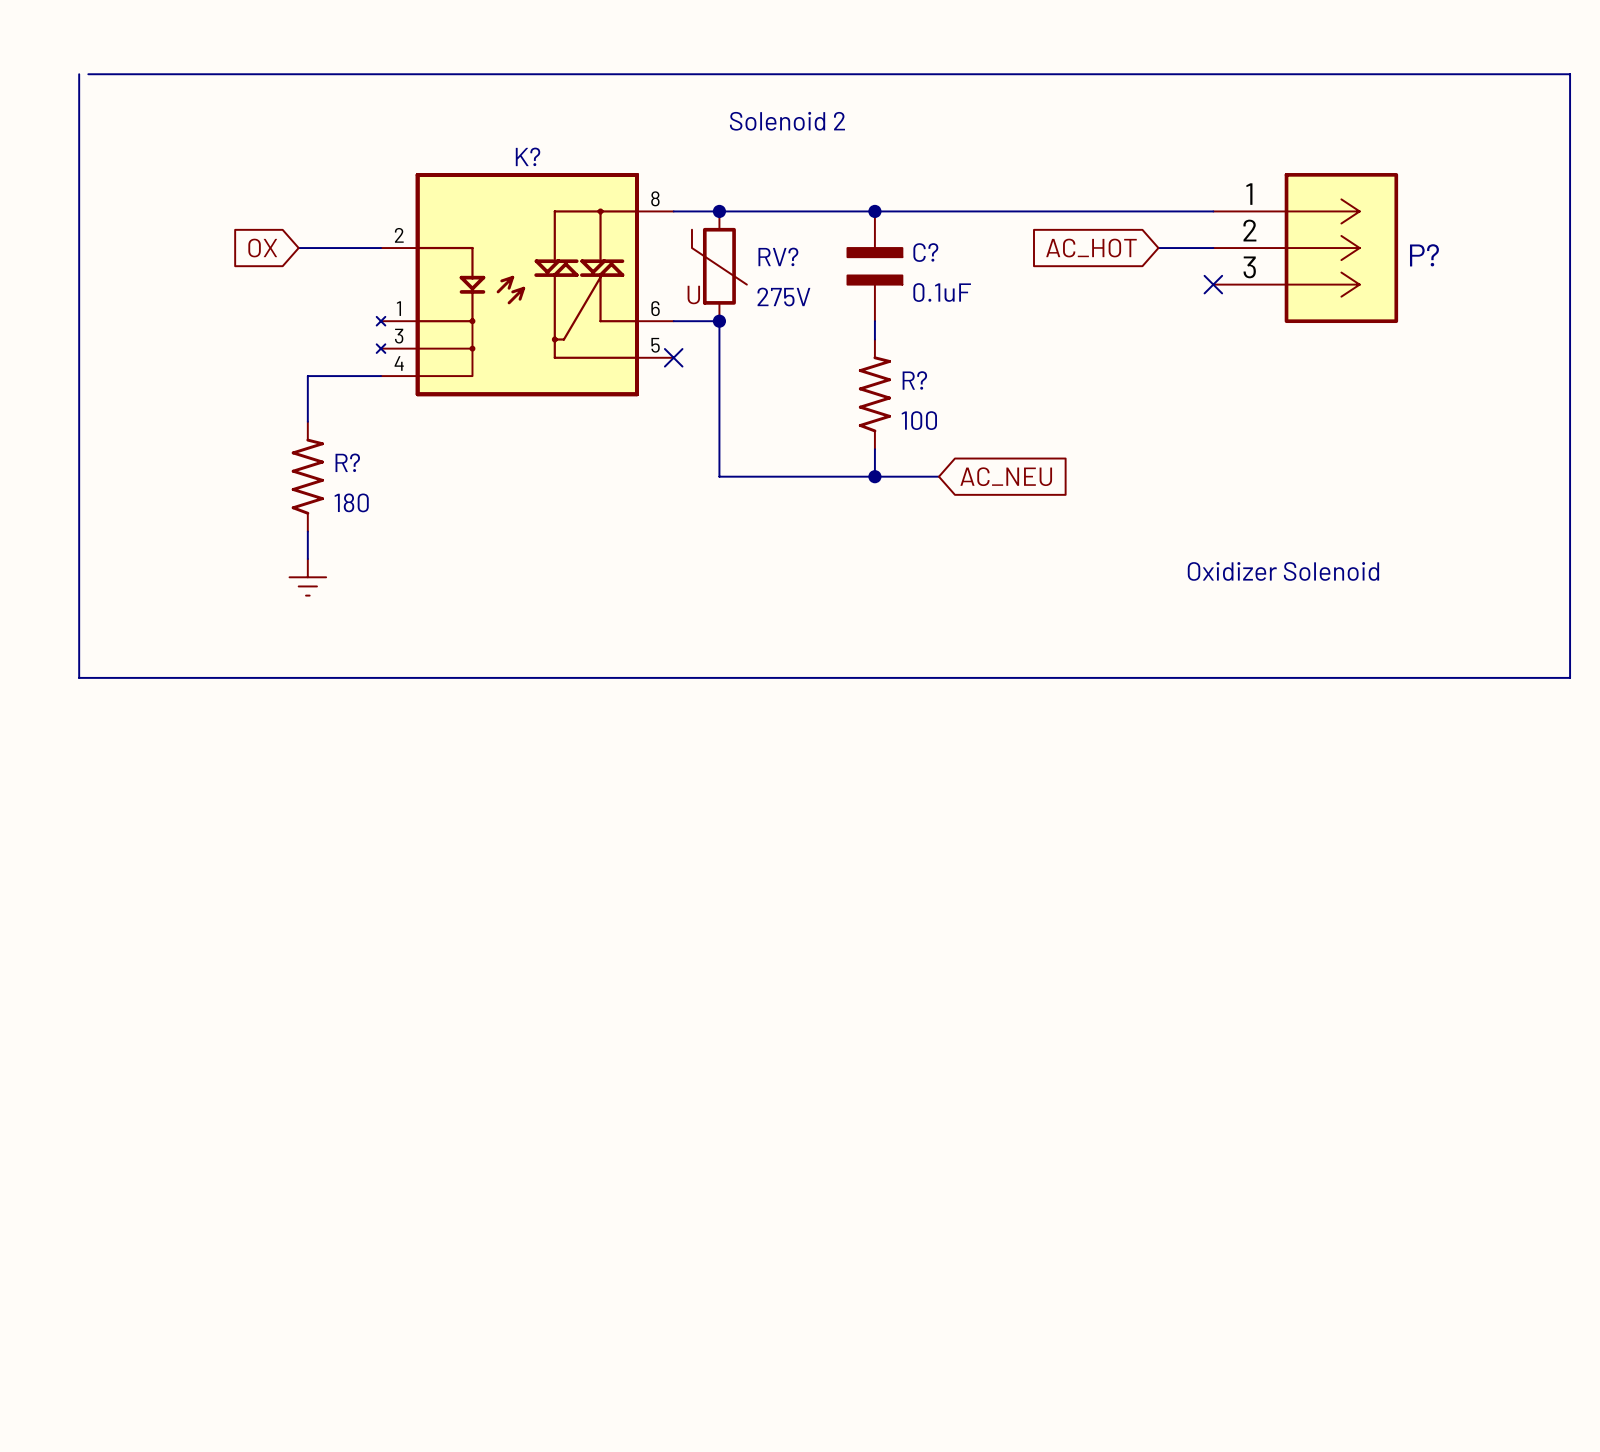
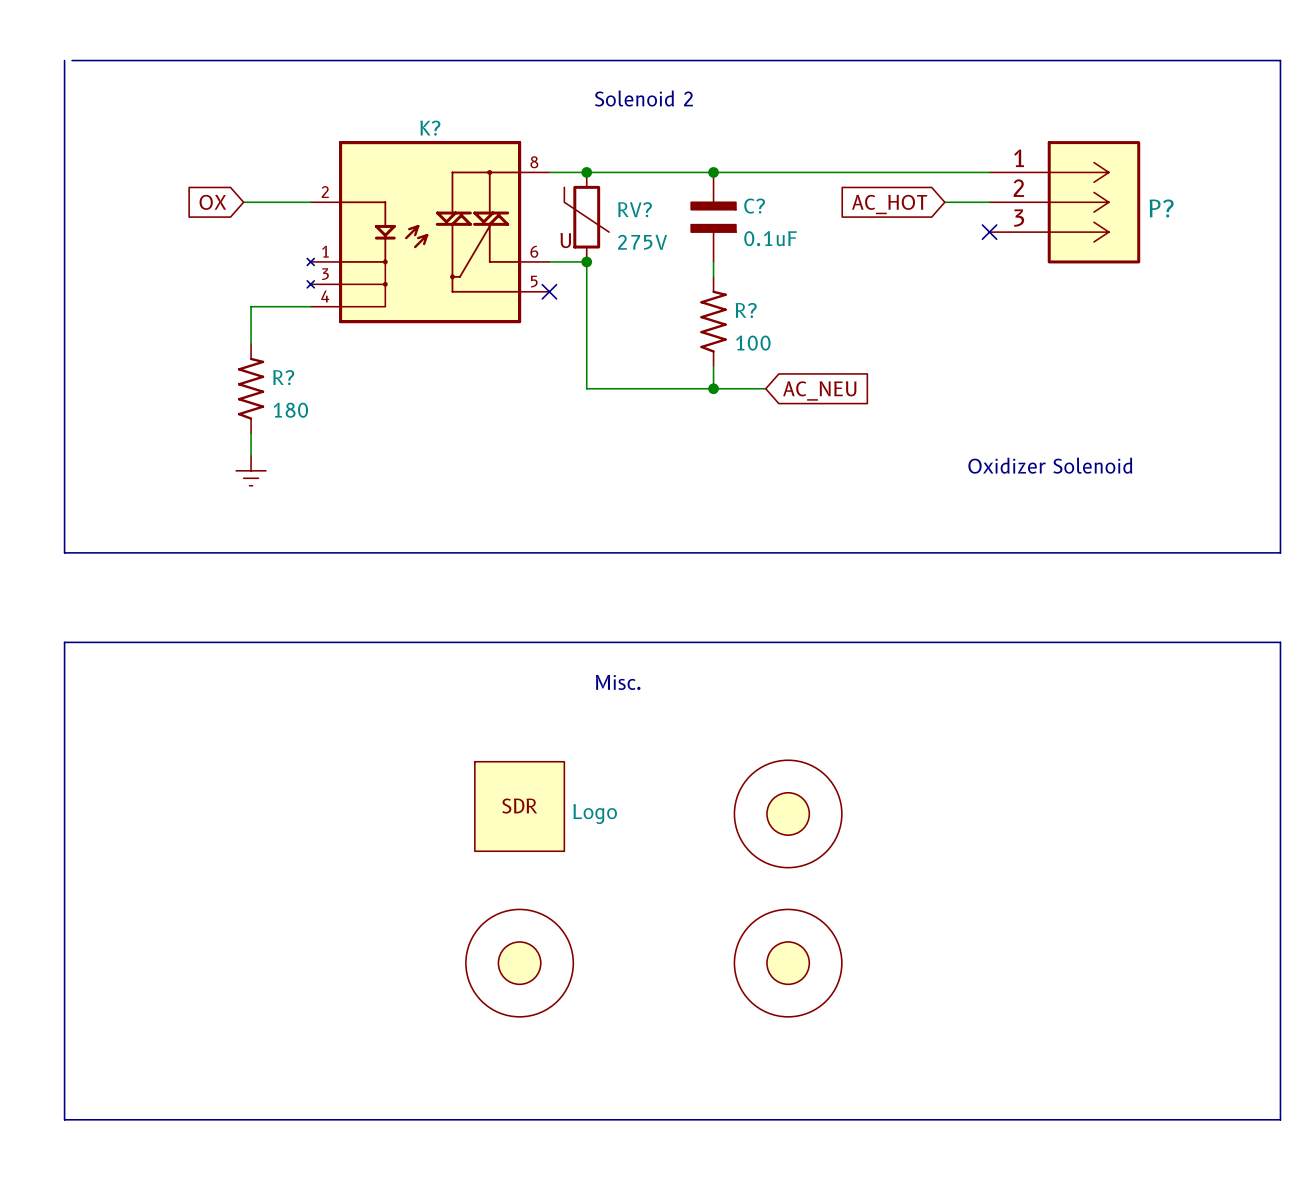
line: none -> (64, 642) (64, 1119) (1280, 1119) (1280, 642) (64, 642)
text: none -> Misc. (618, 682)
part: none -> Logo (519, 806)
part: none -> (788, 813)
part: none -> (519, 963)
part: none -> (788, 963)

